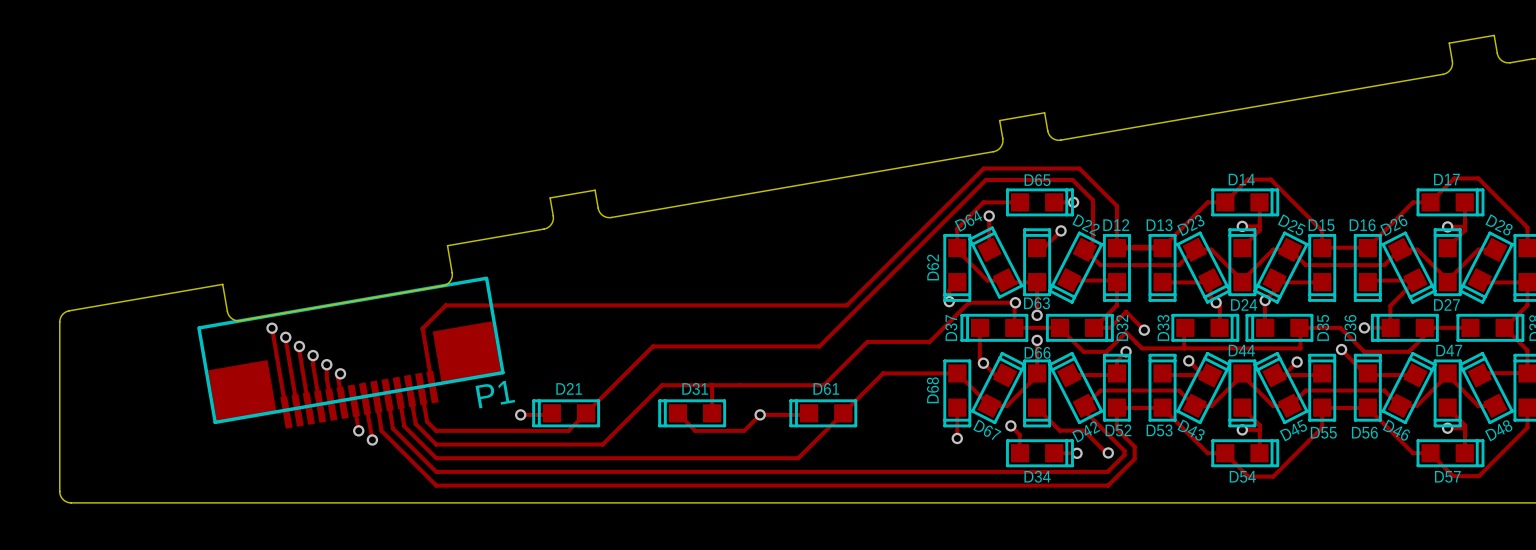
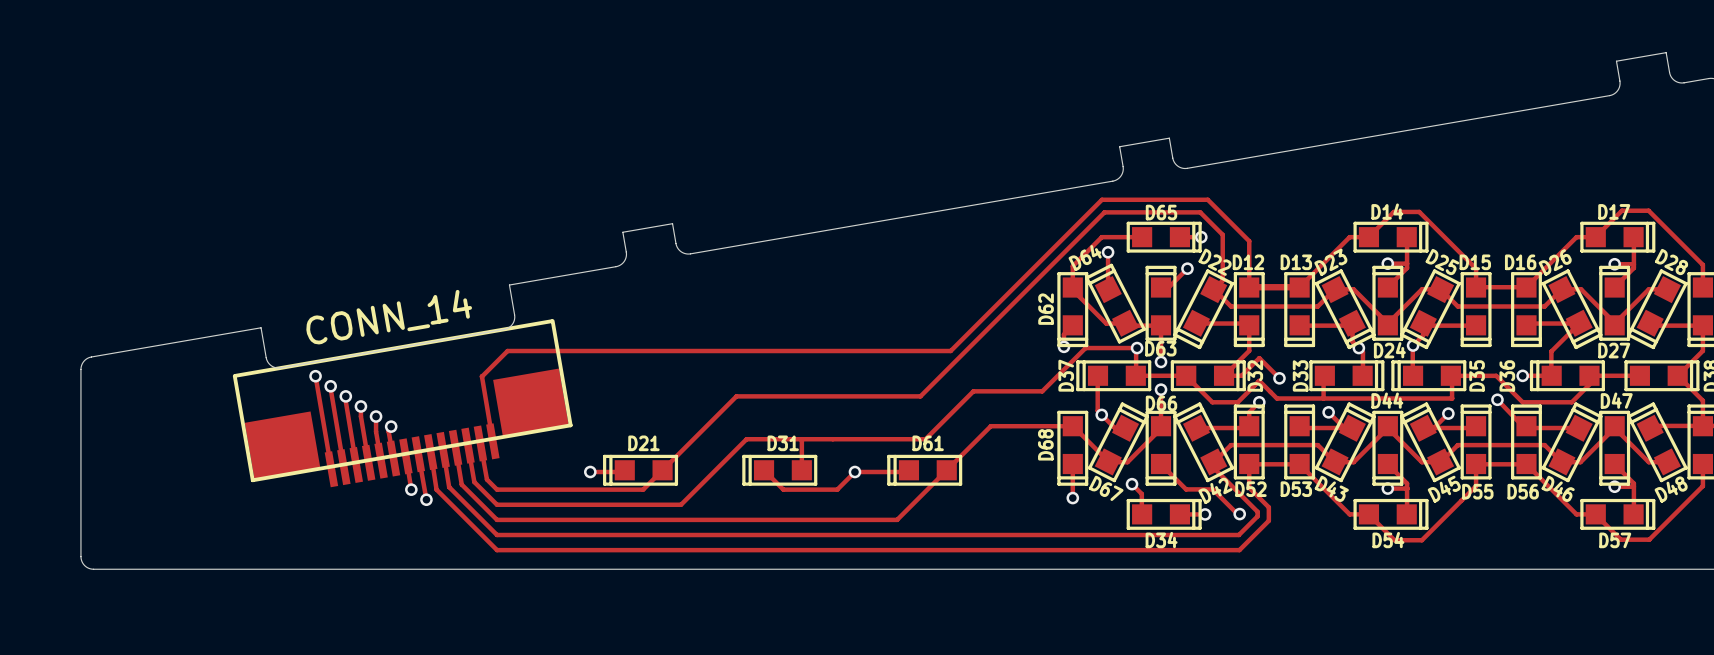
P1 value: none -> CONN_14 (389, 317)
P1 name: P1 (495, 394) -> none

